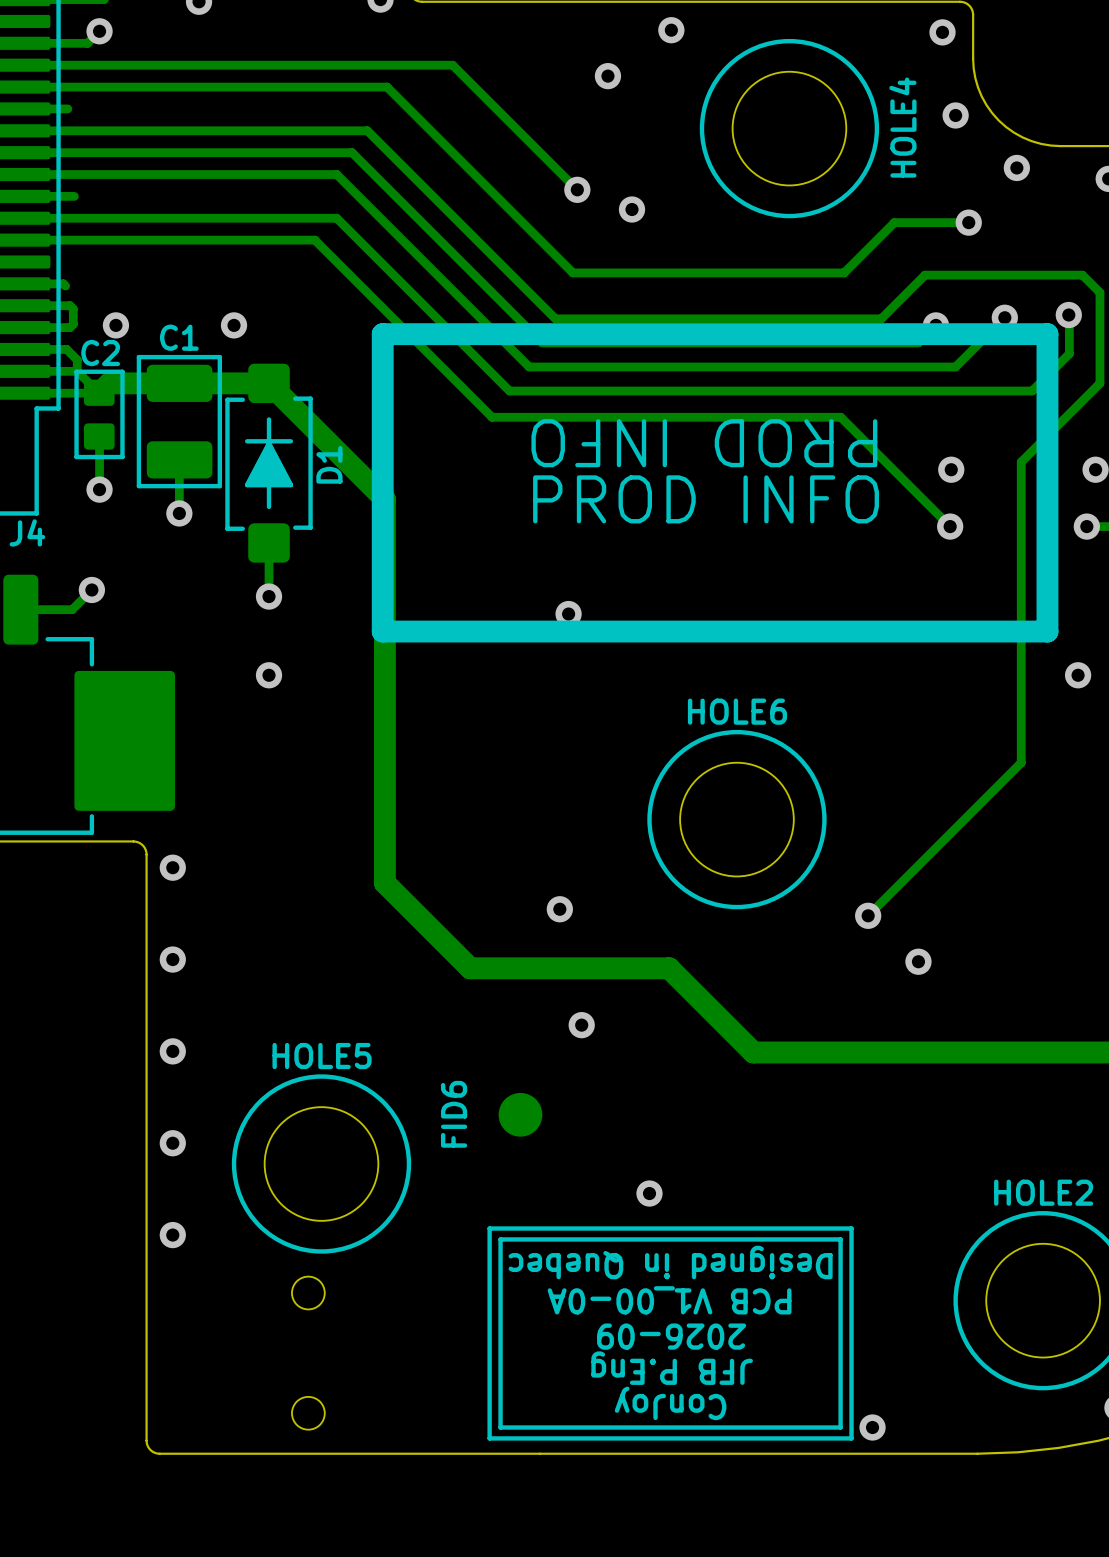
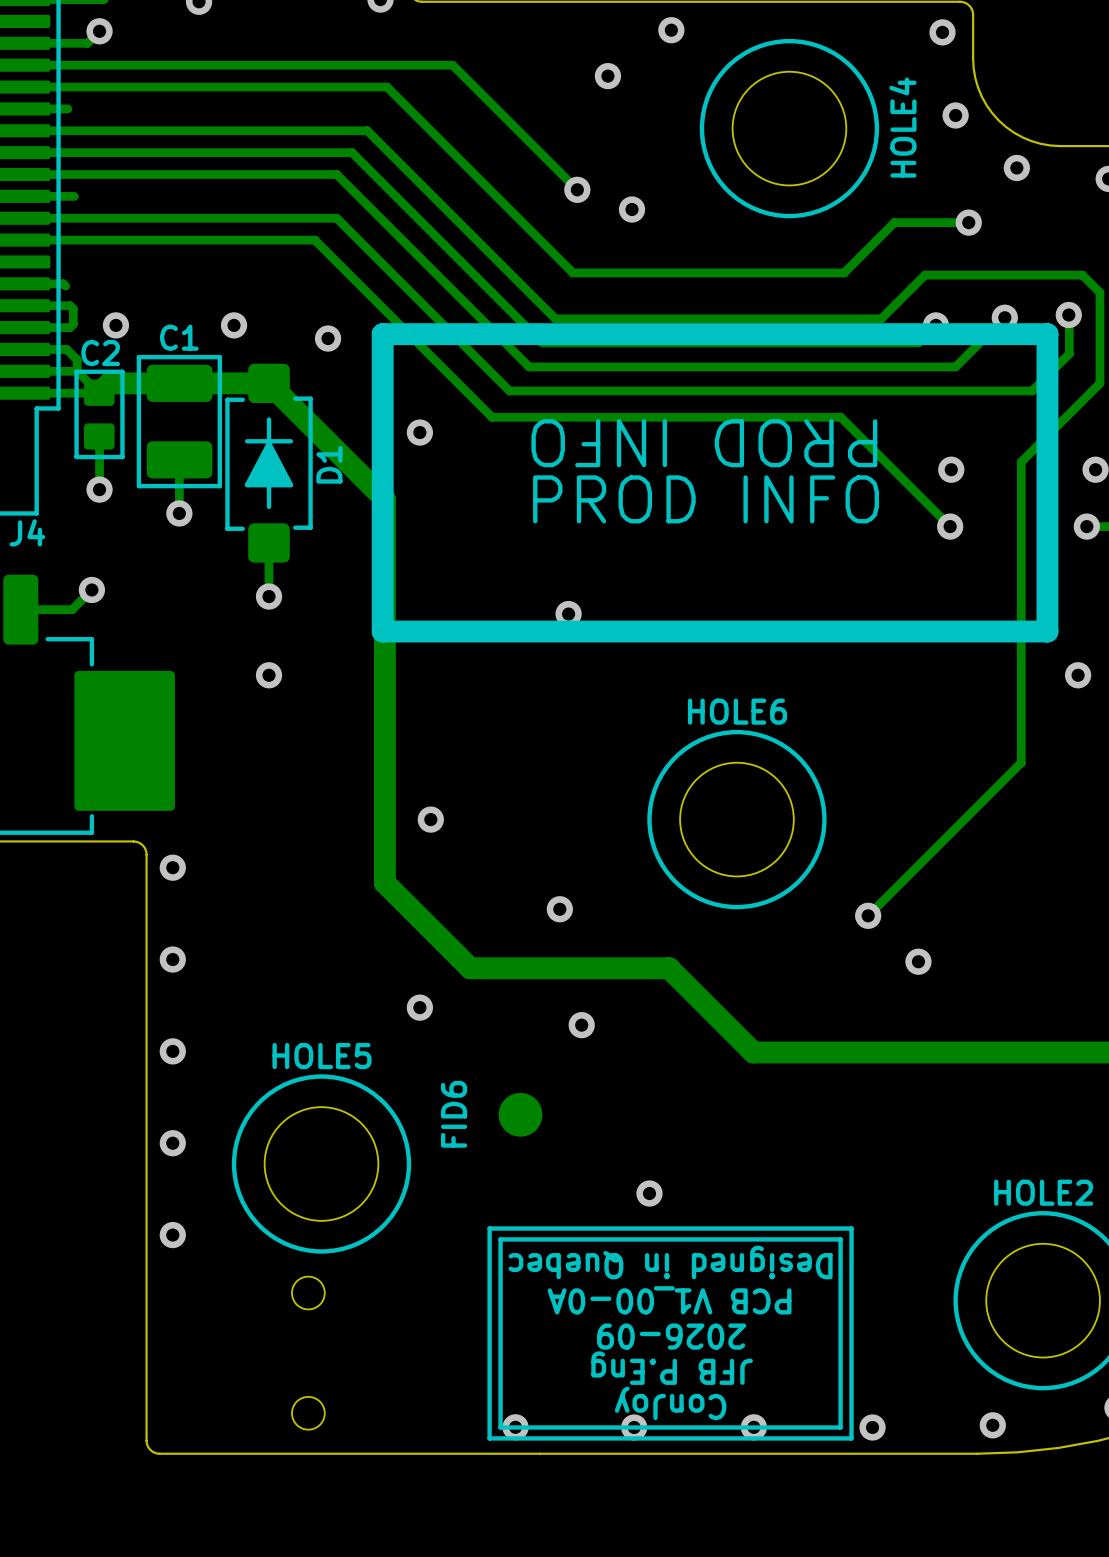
via: none -> (328, 338)
via: none -> (419, 432)
via: none -> (430, 819)
via: none -> (419, 1007)
via: none -> (992, 1425)
via: none -> (515, 1427)
via: none -> (634, 1427)
via: none -> (753, 1427)

